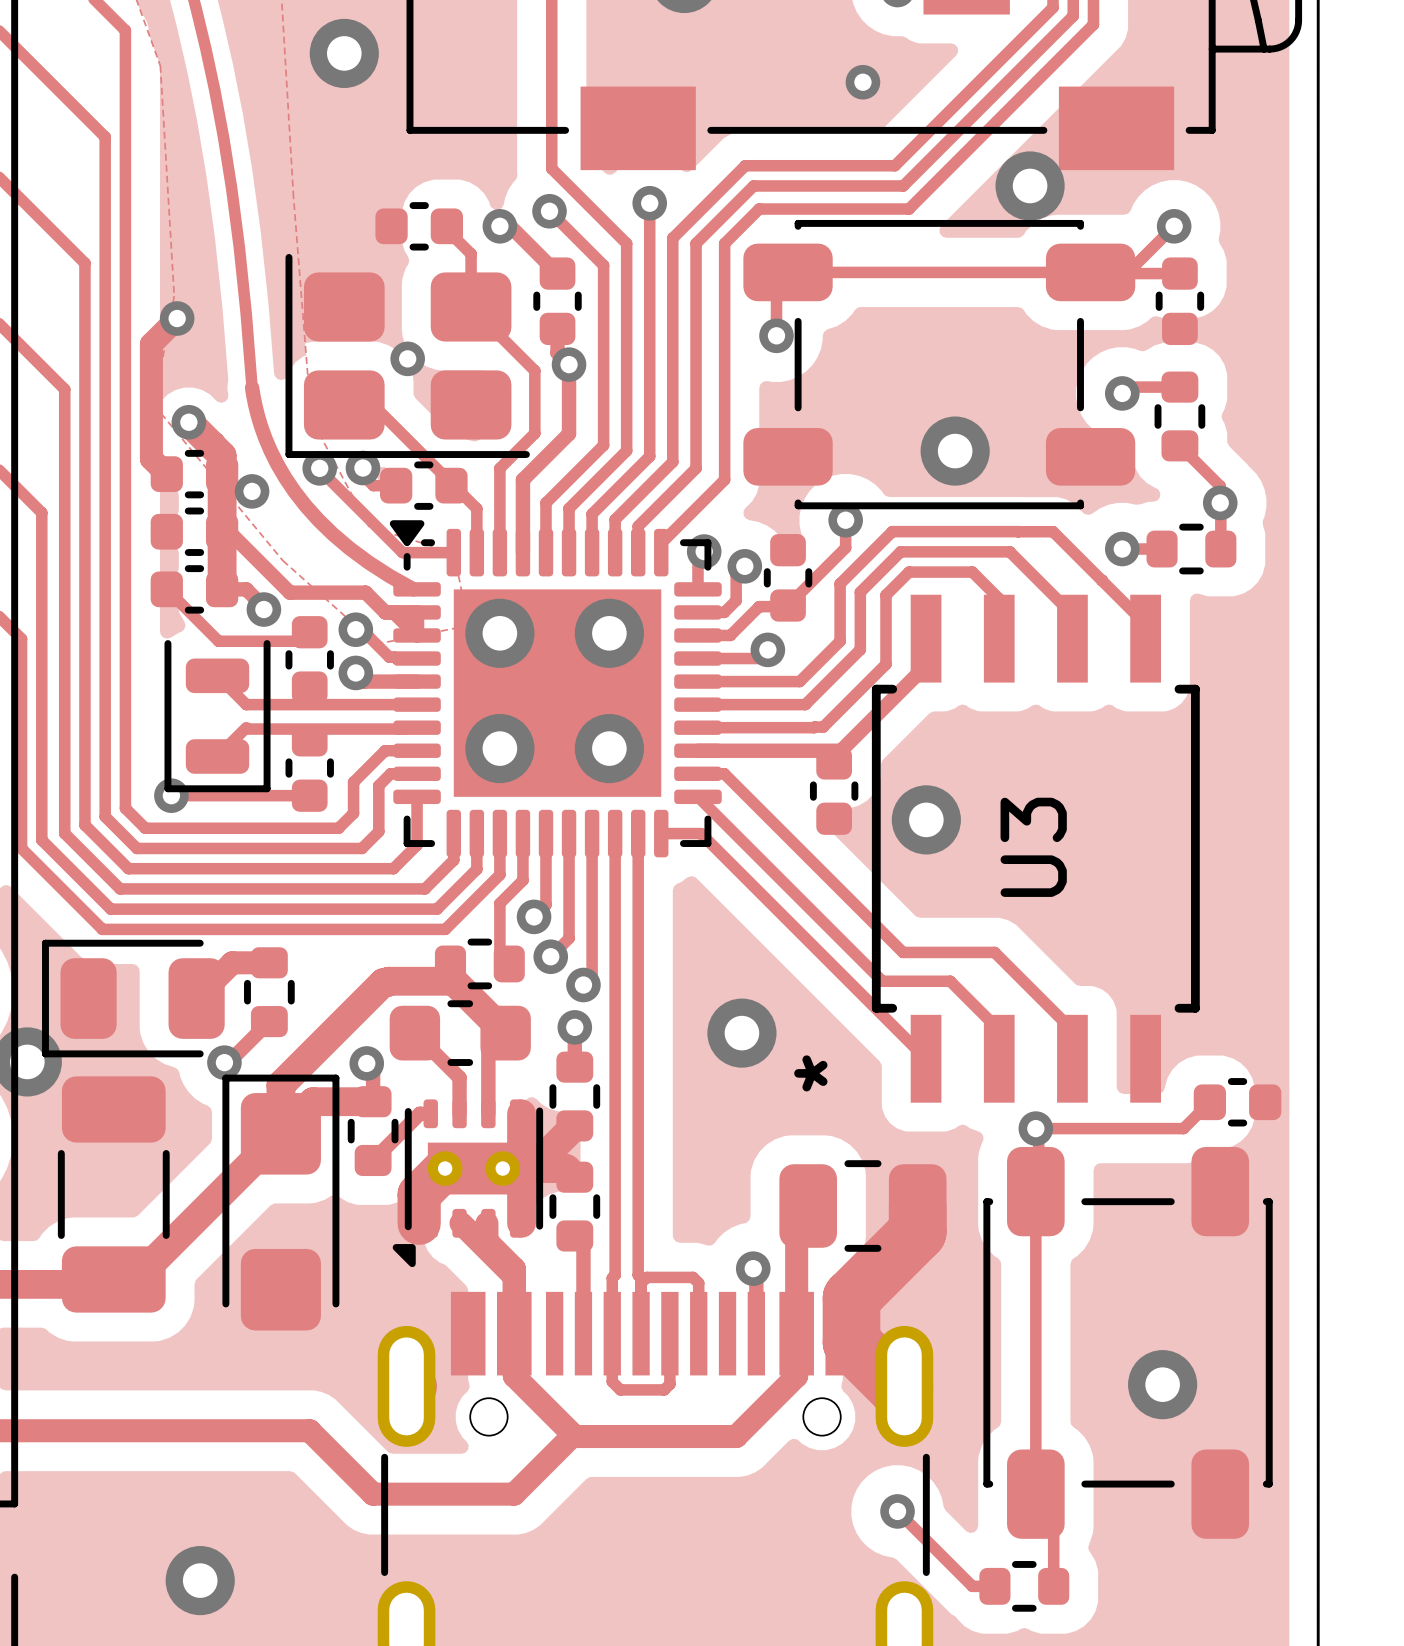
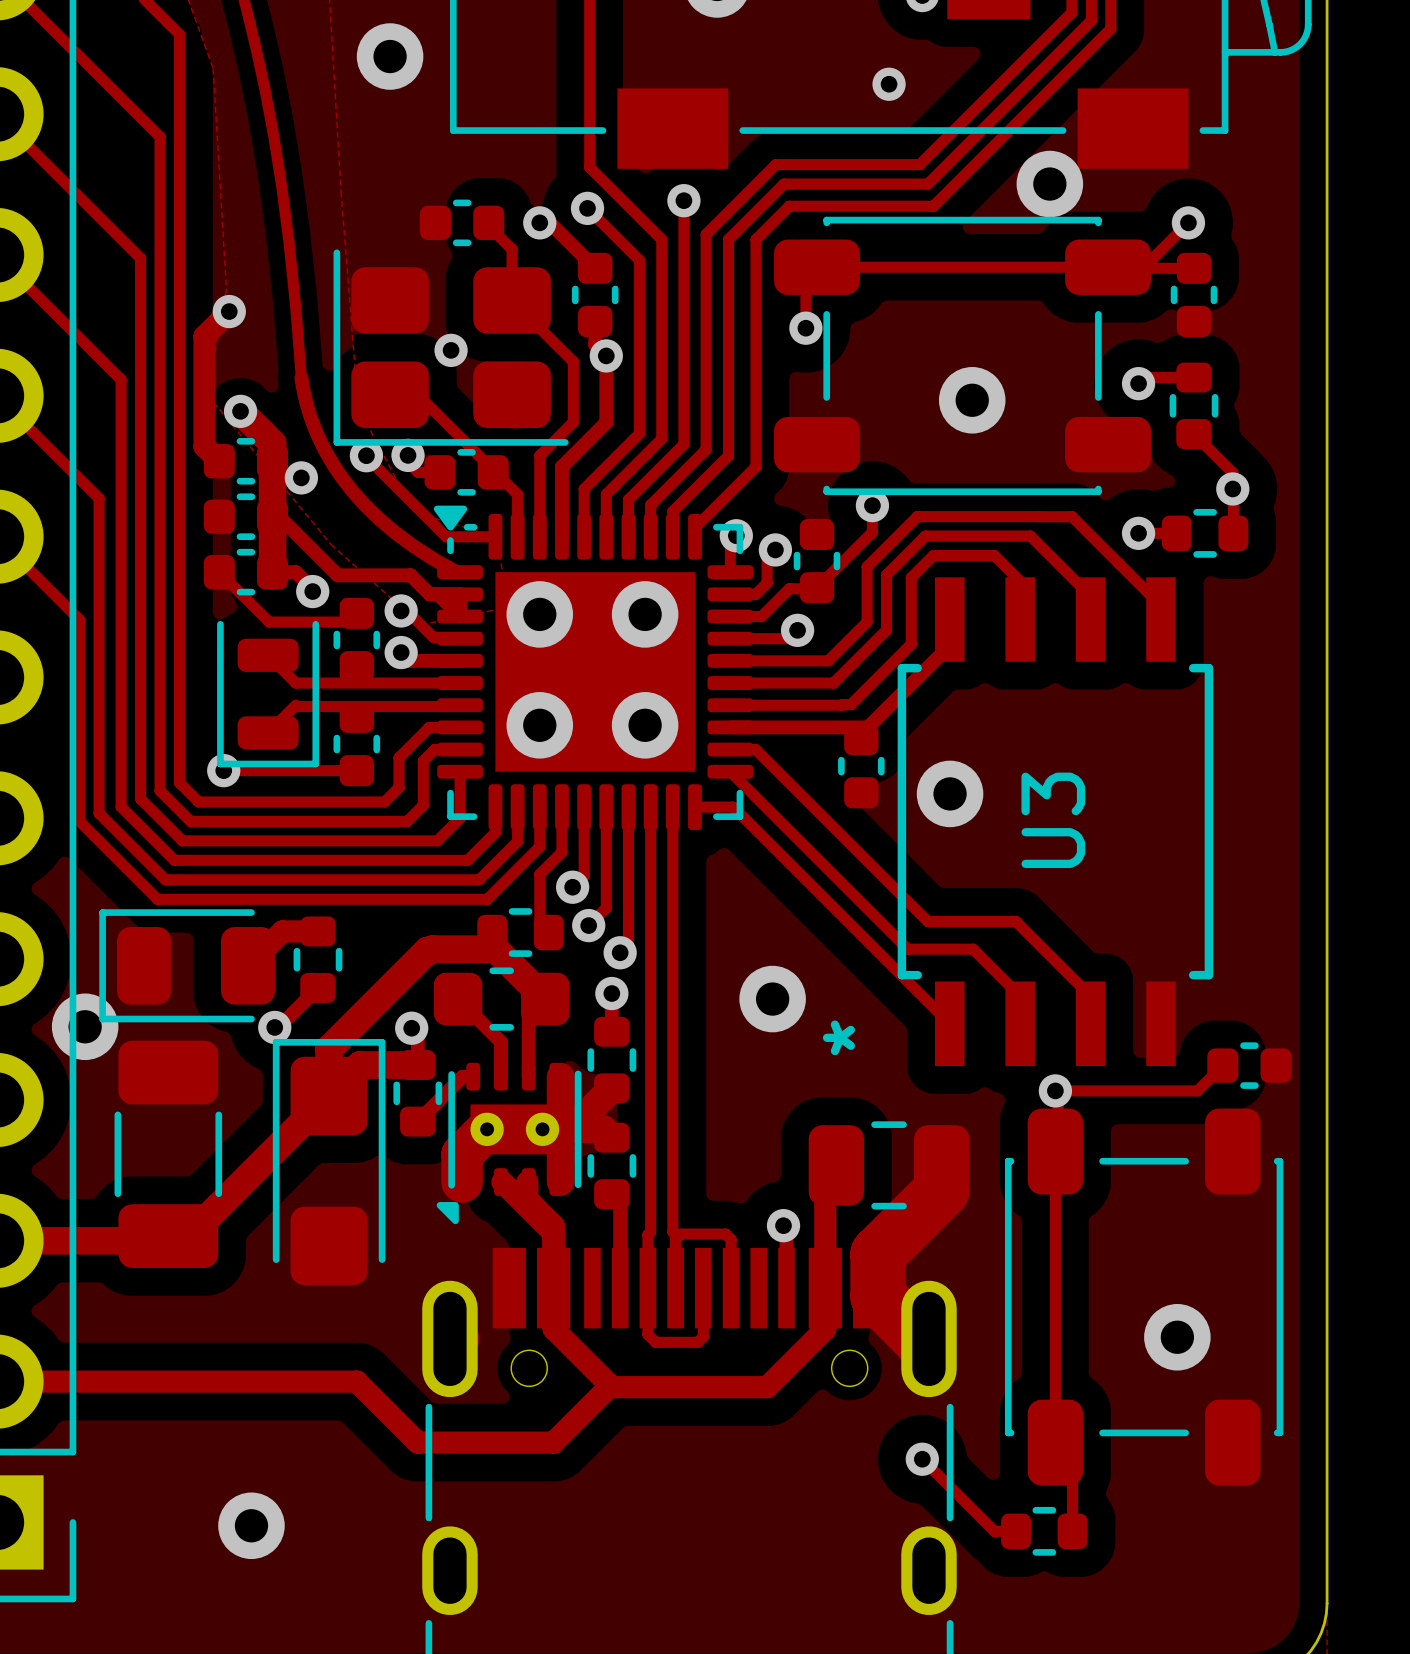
via position: (955, 451) -> (972, 400)

